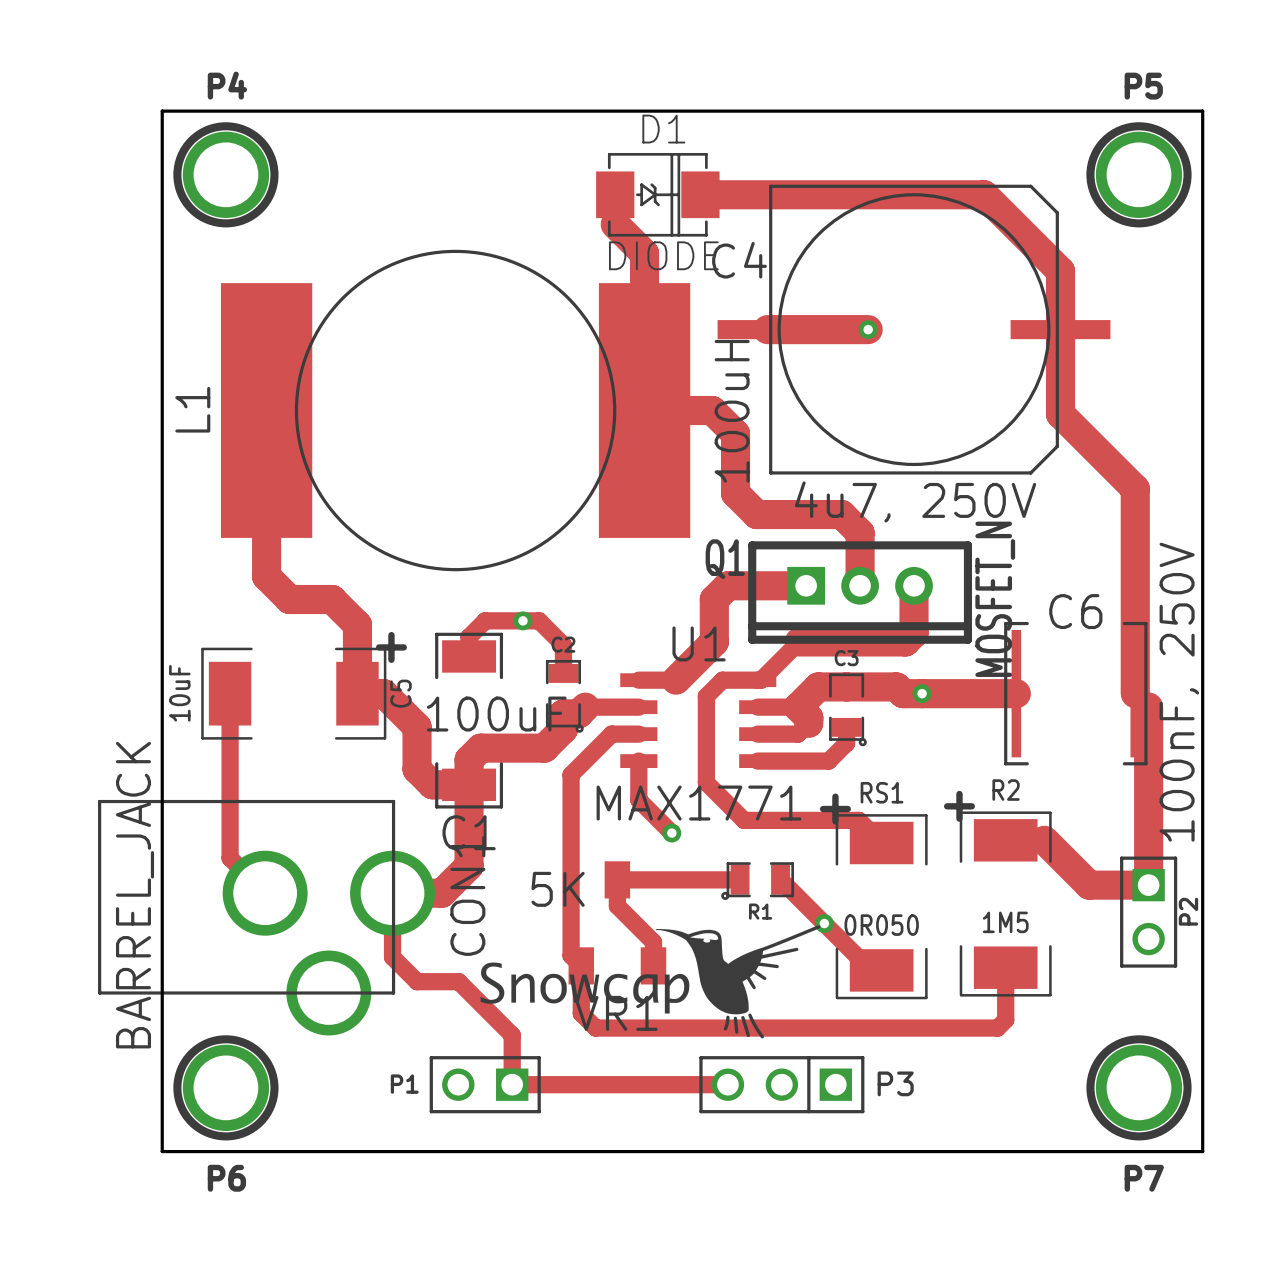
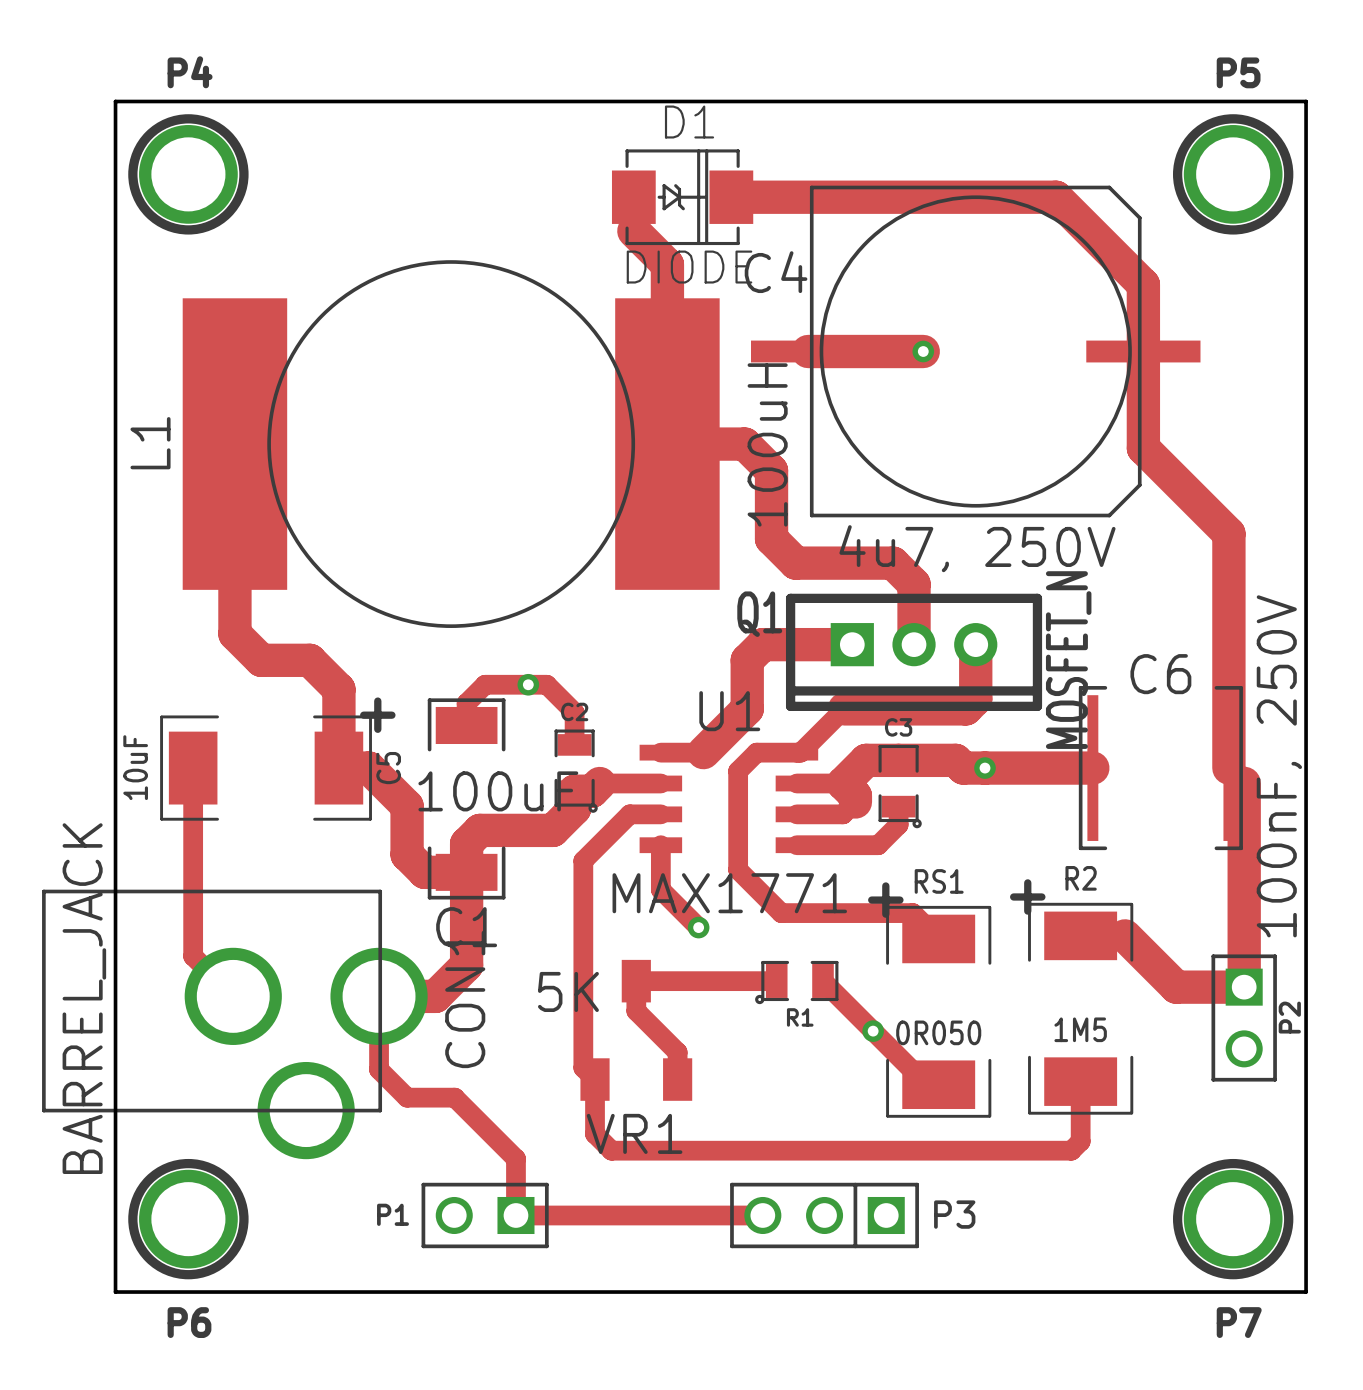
drawing: [480, 925, 821, 1039] -> none

